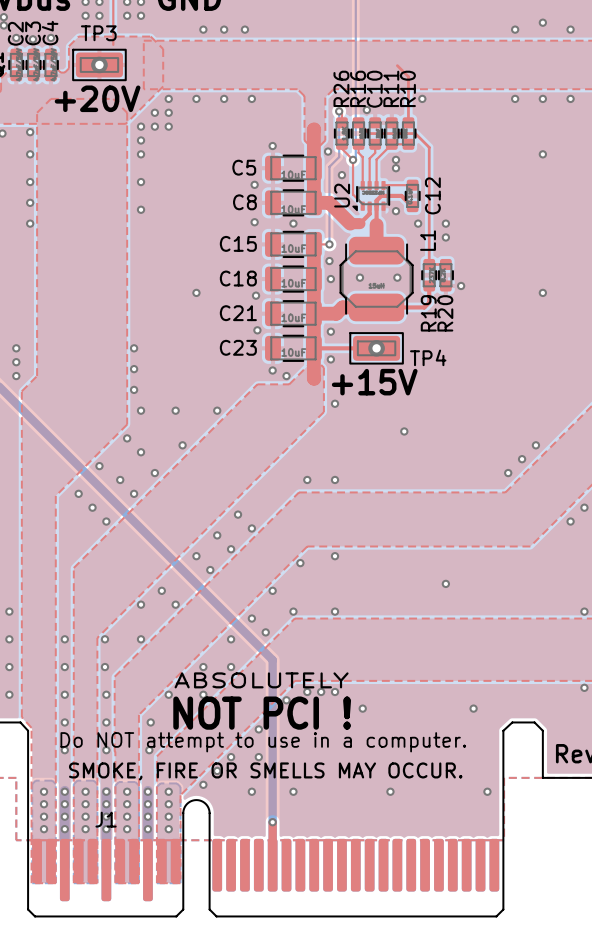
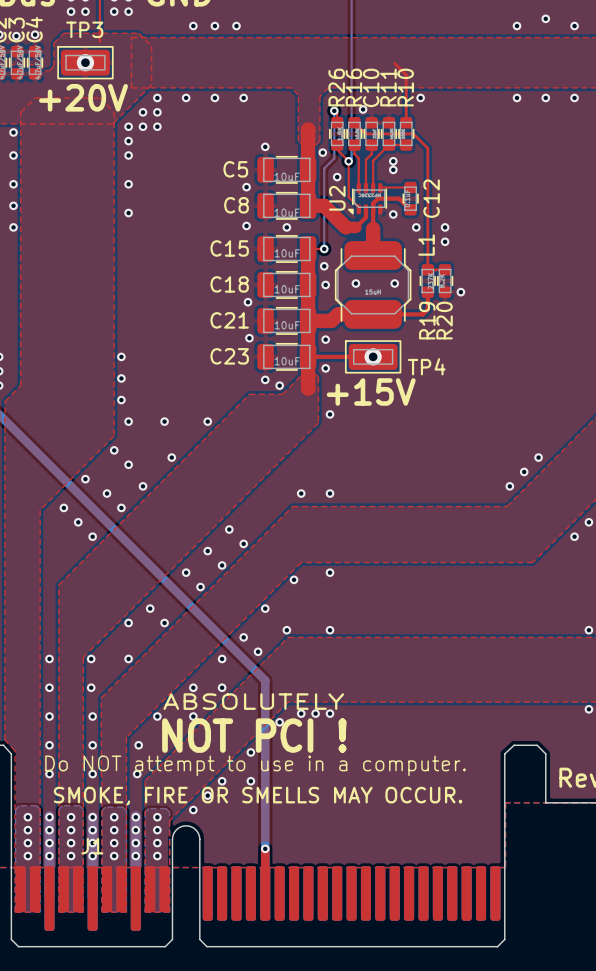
via: (542, 154) -> none
via: (196, 292) -> none
via: (542, 292) -> none
via: (404, 431) -> none
via: (445, 583) -> none
via: (362, 708) -> none
via: (473, 708) -> none
via: (251, 791) -> none
via: (293, 791) -> none
via: (390, 791) -> none
via: (487, 791) -> none

